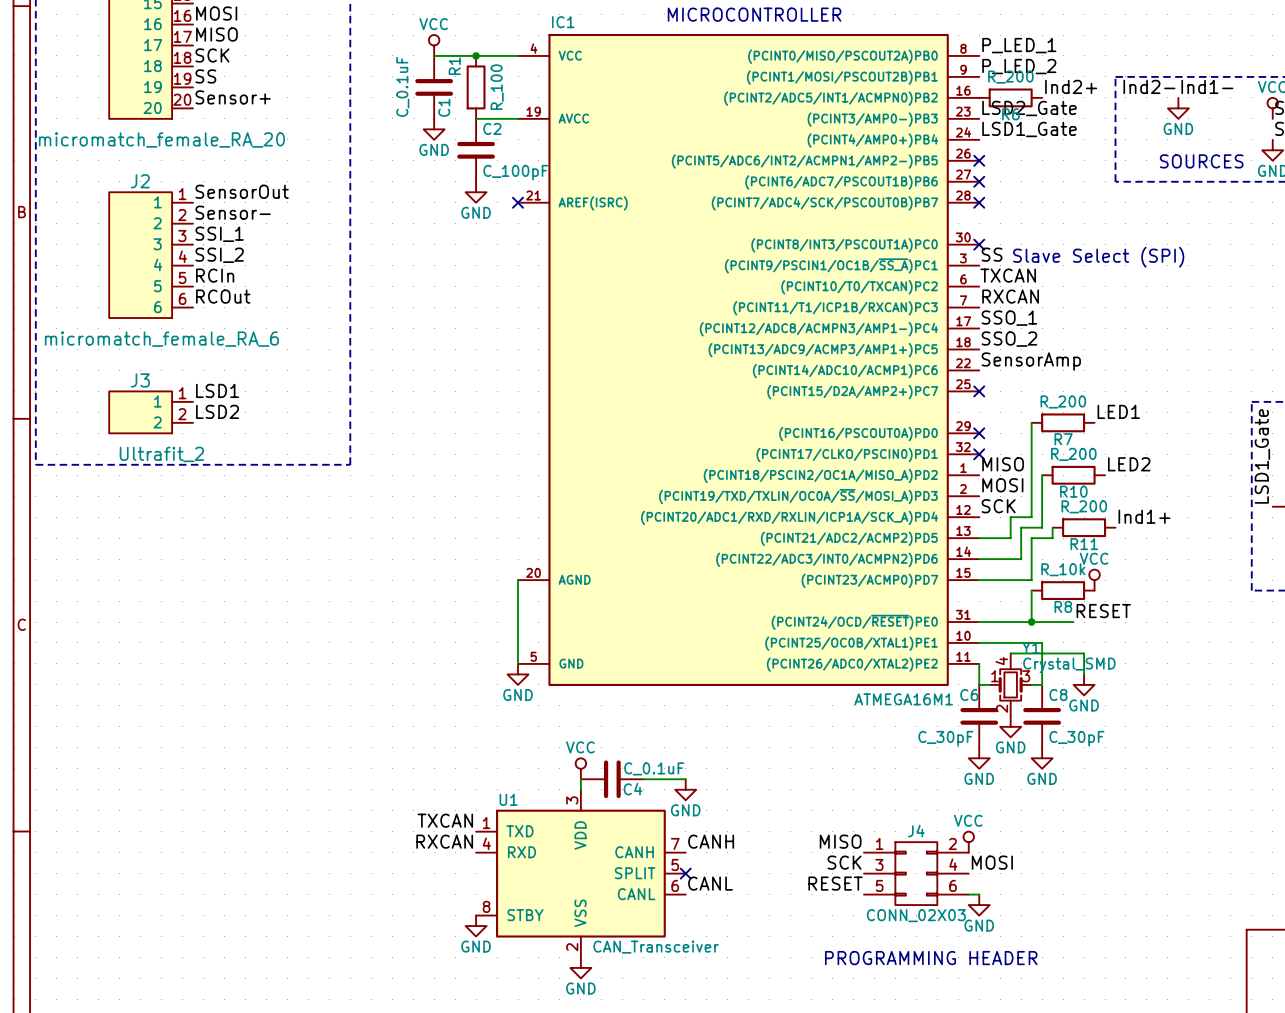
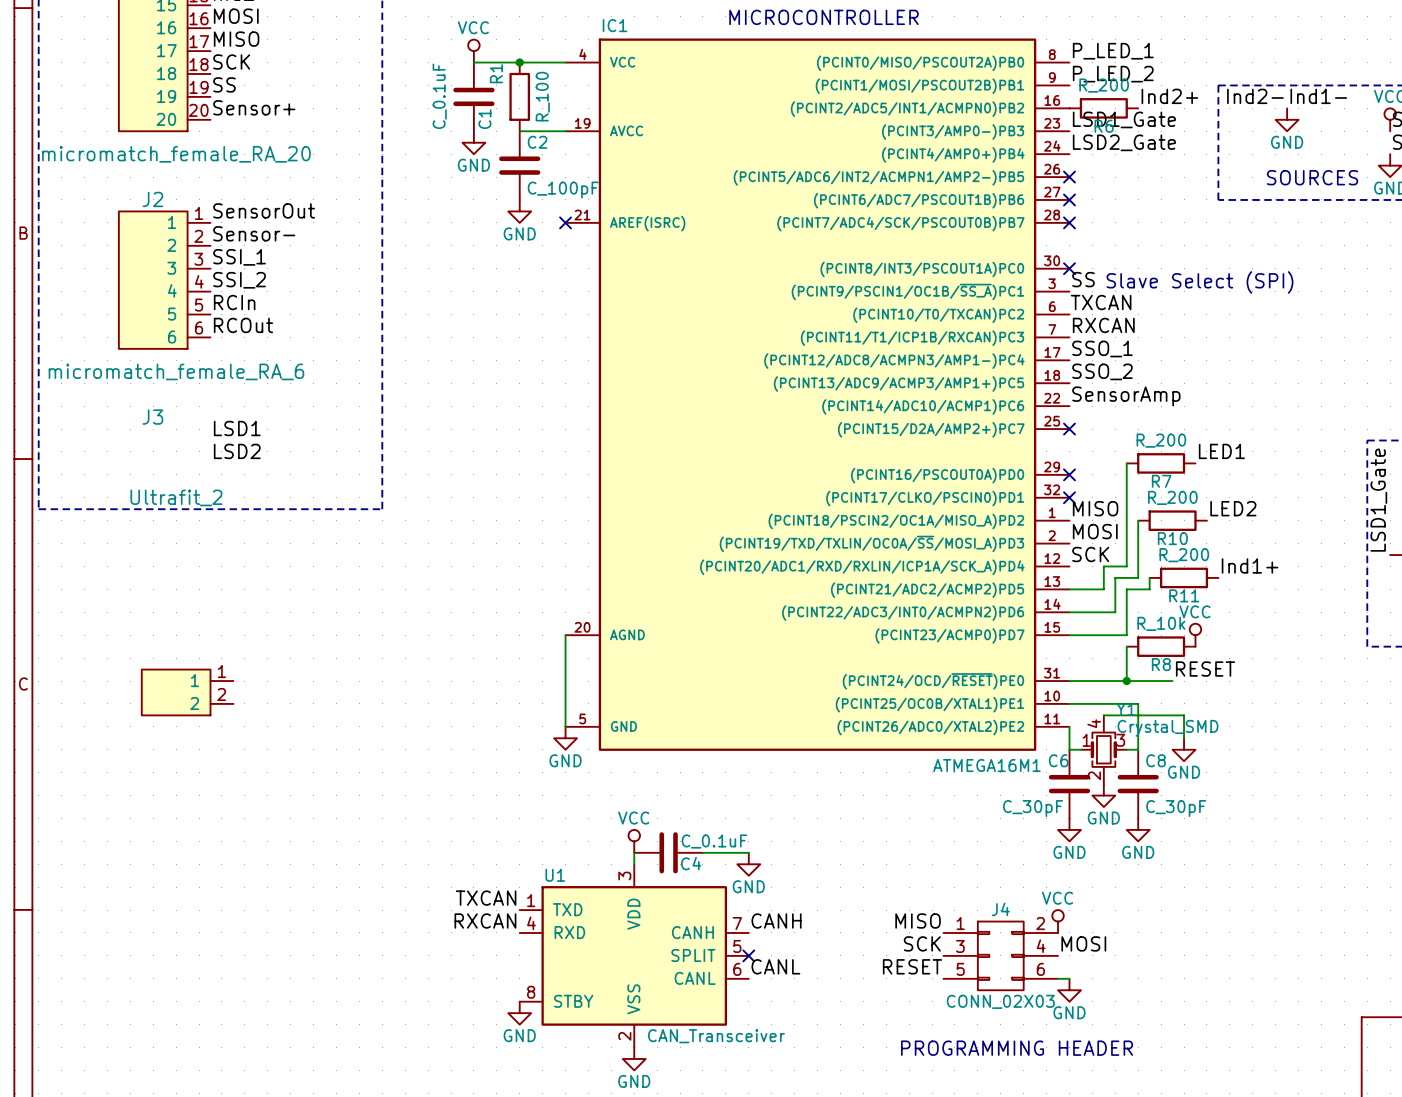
label: LSD2_Gate (1029, 108) -> LSD1_Gate (1124, 119)
label: LSD1_Gate (1029, 129) -> LSD2_Gate (1124, 142)
J3 position: (151, 412) -> (187, 692)

